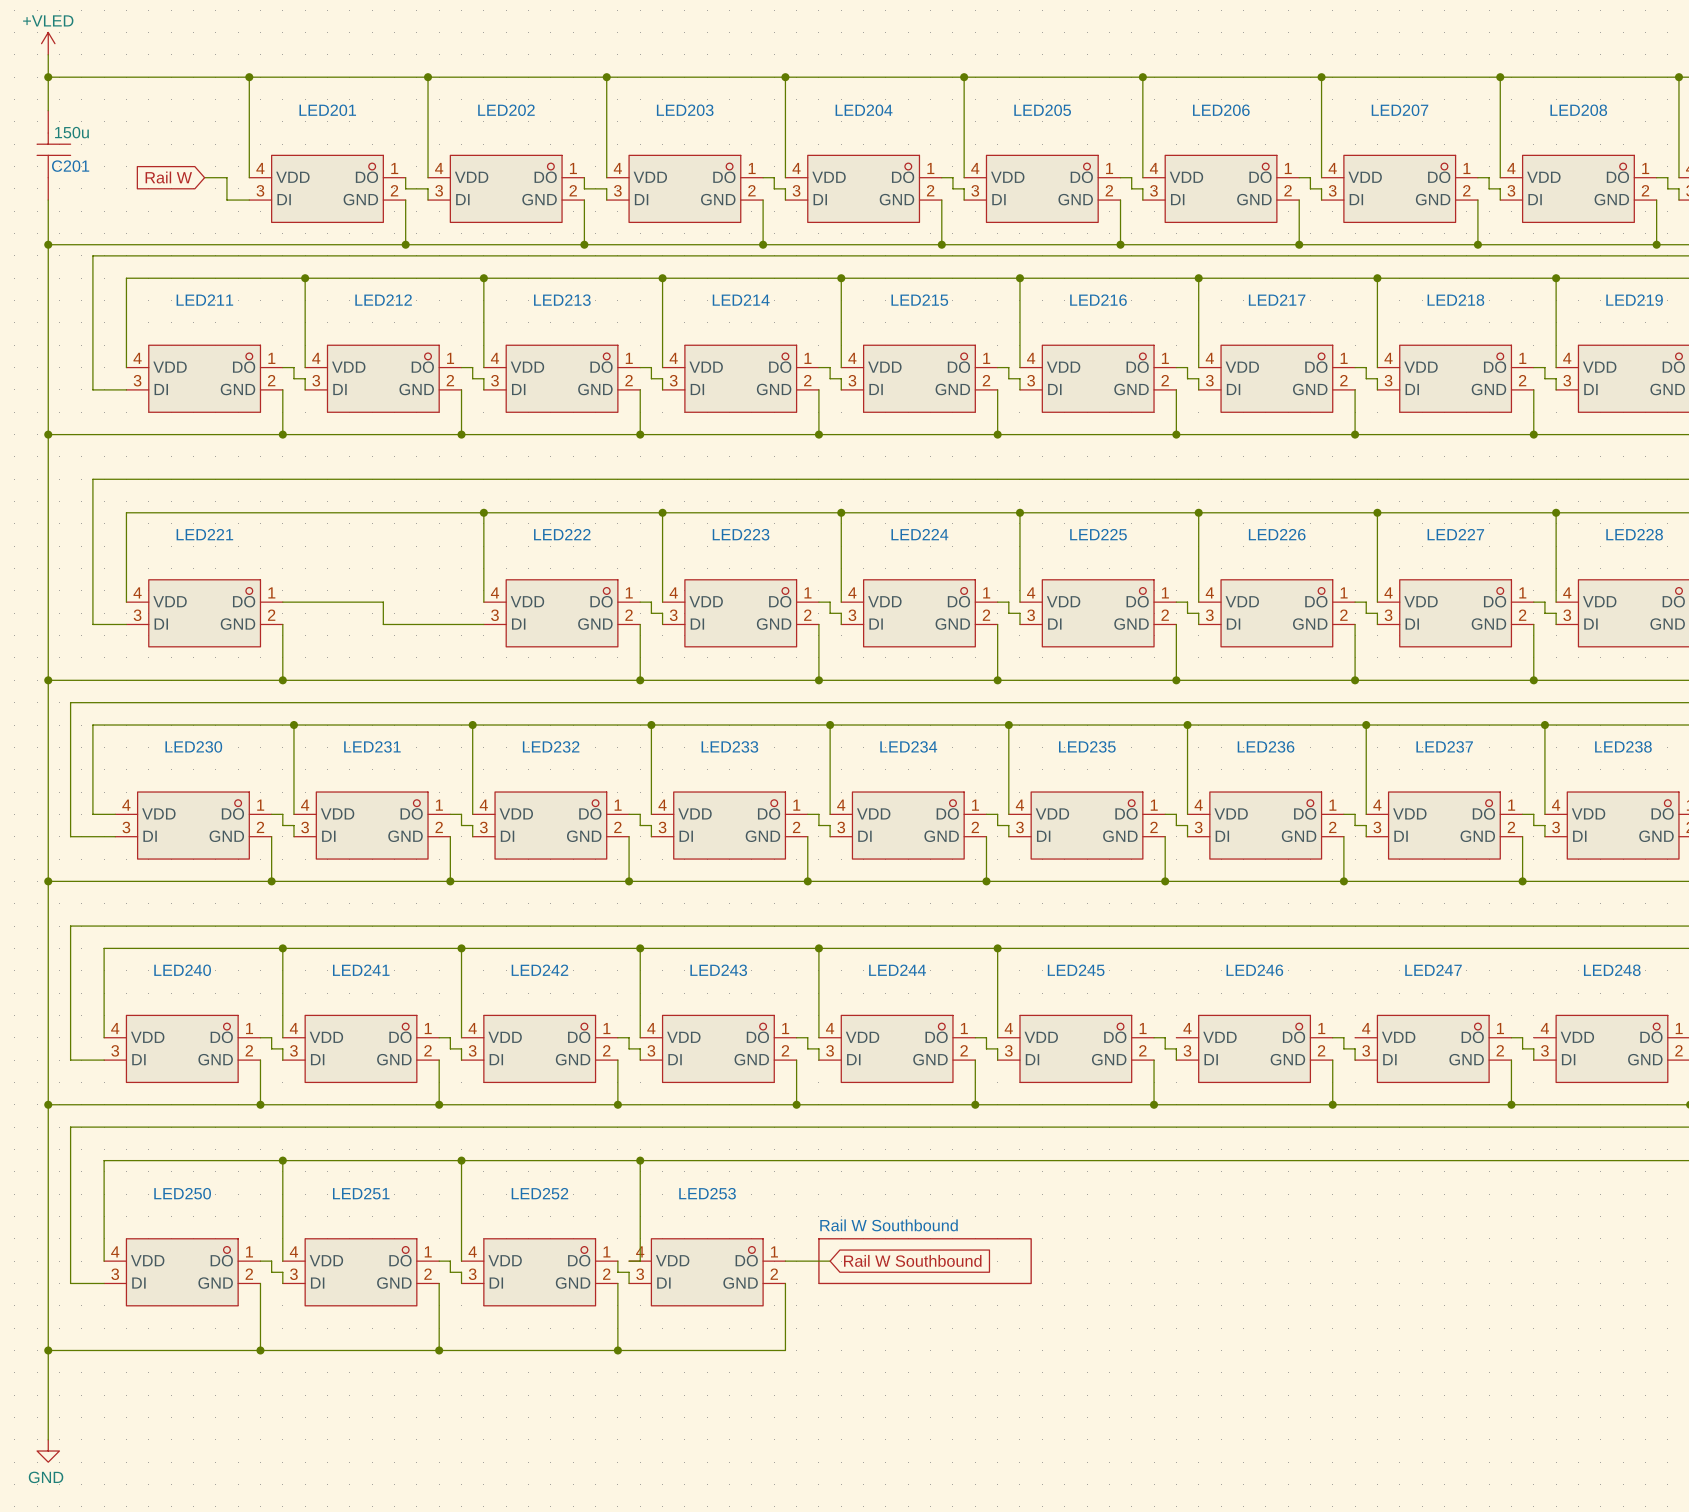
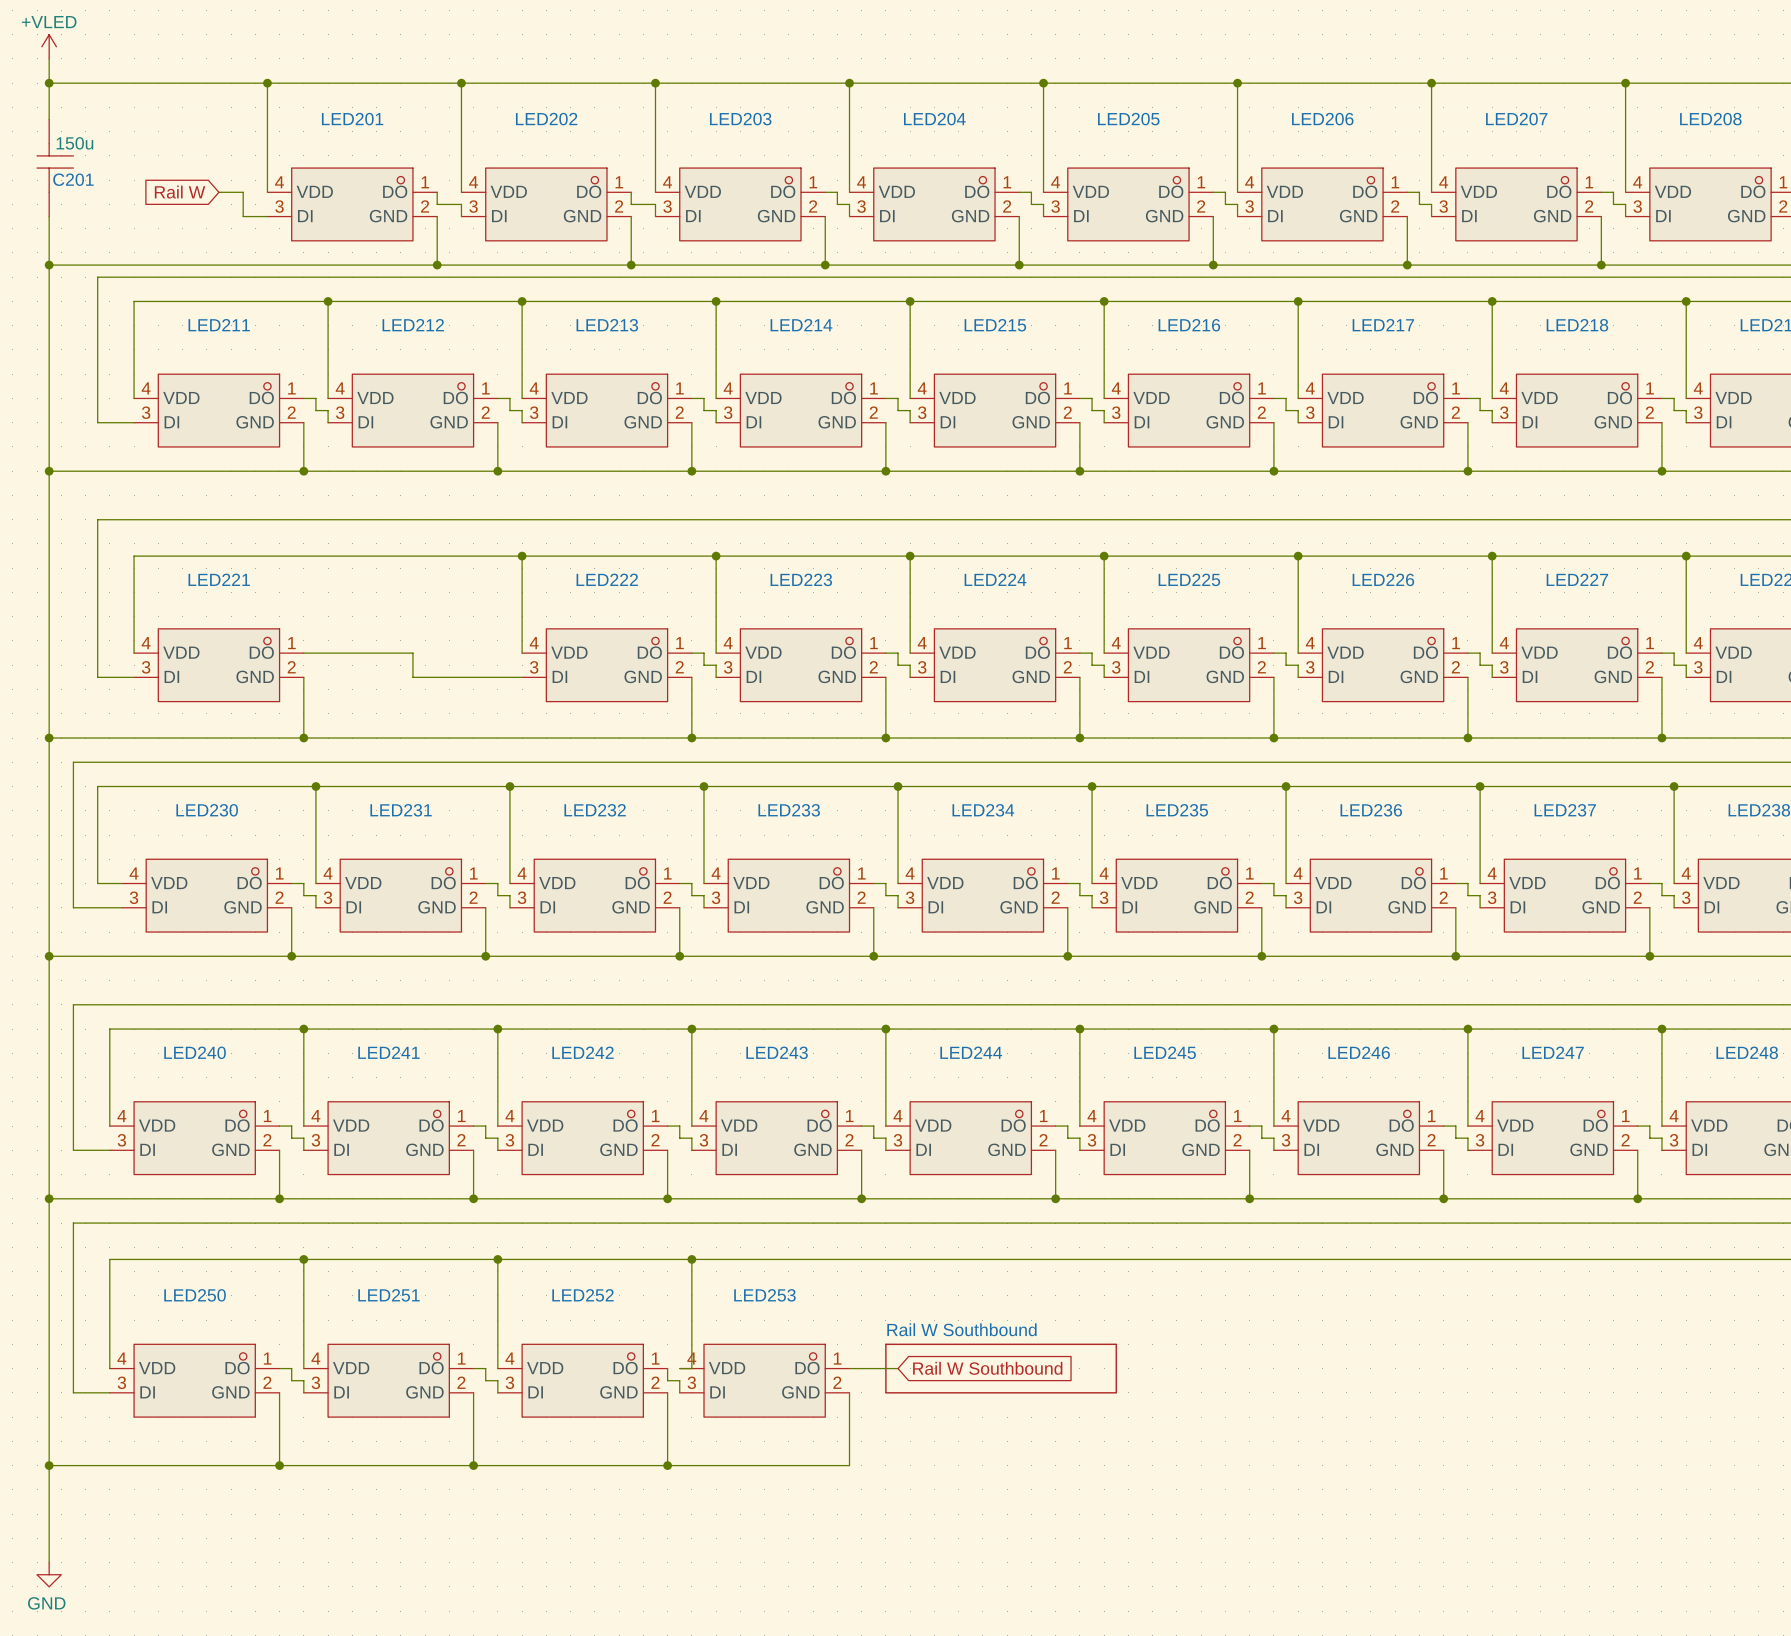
wire: none -> (1273, 1029) (1273, 1126)
junction: none -> (1273, 1029)
wire: none -> (1467, 1029) (1467, 1126)
junction: none -> (1467, 1029)
wire: none -> (1661, 1029) (1661, 1126)
junction: none -> (1661, 1029)

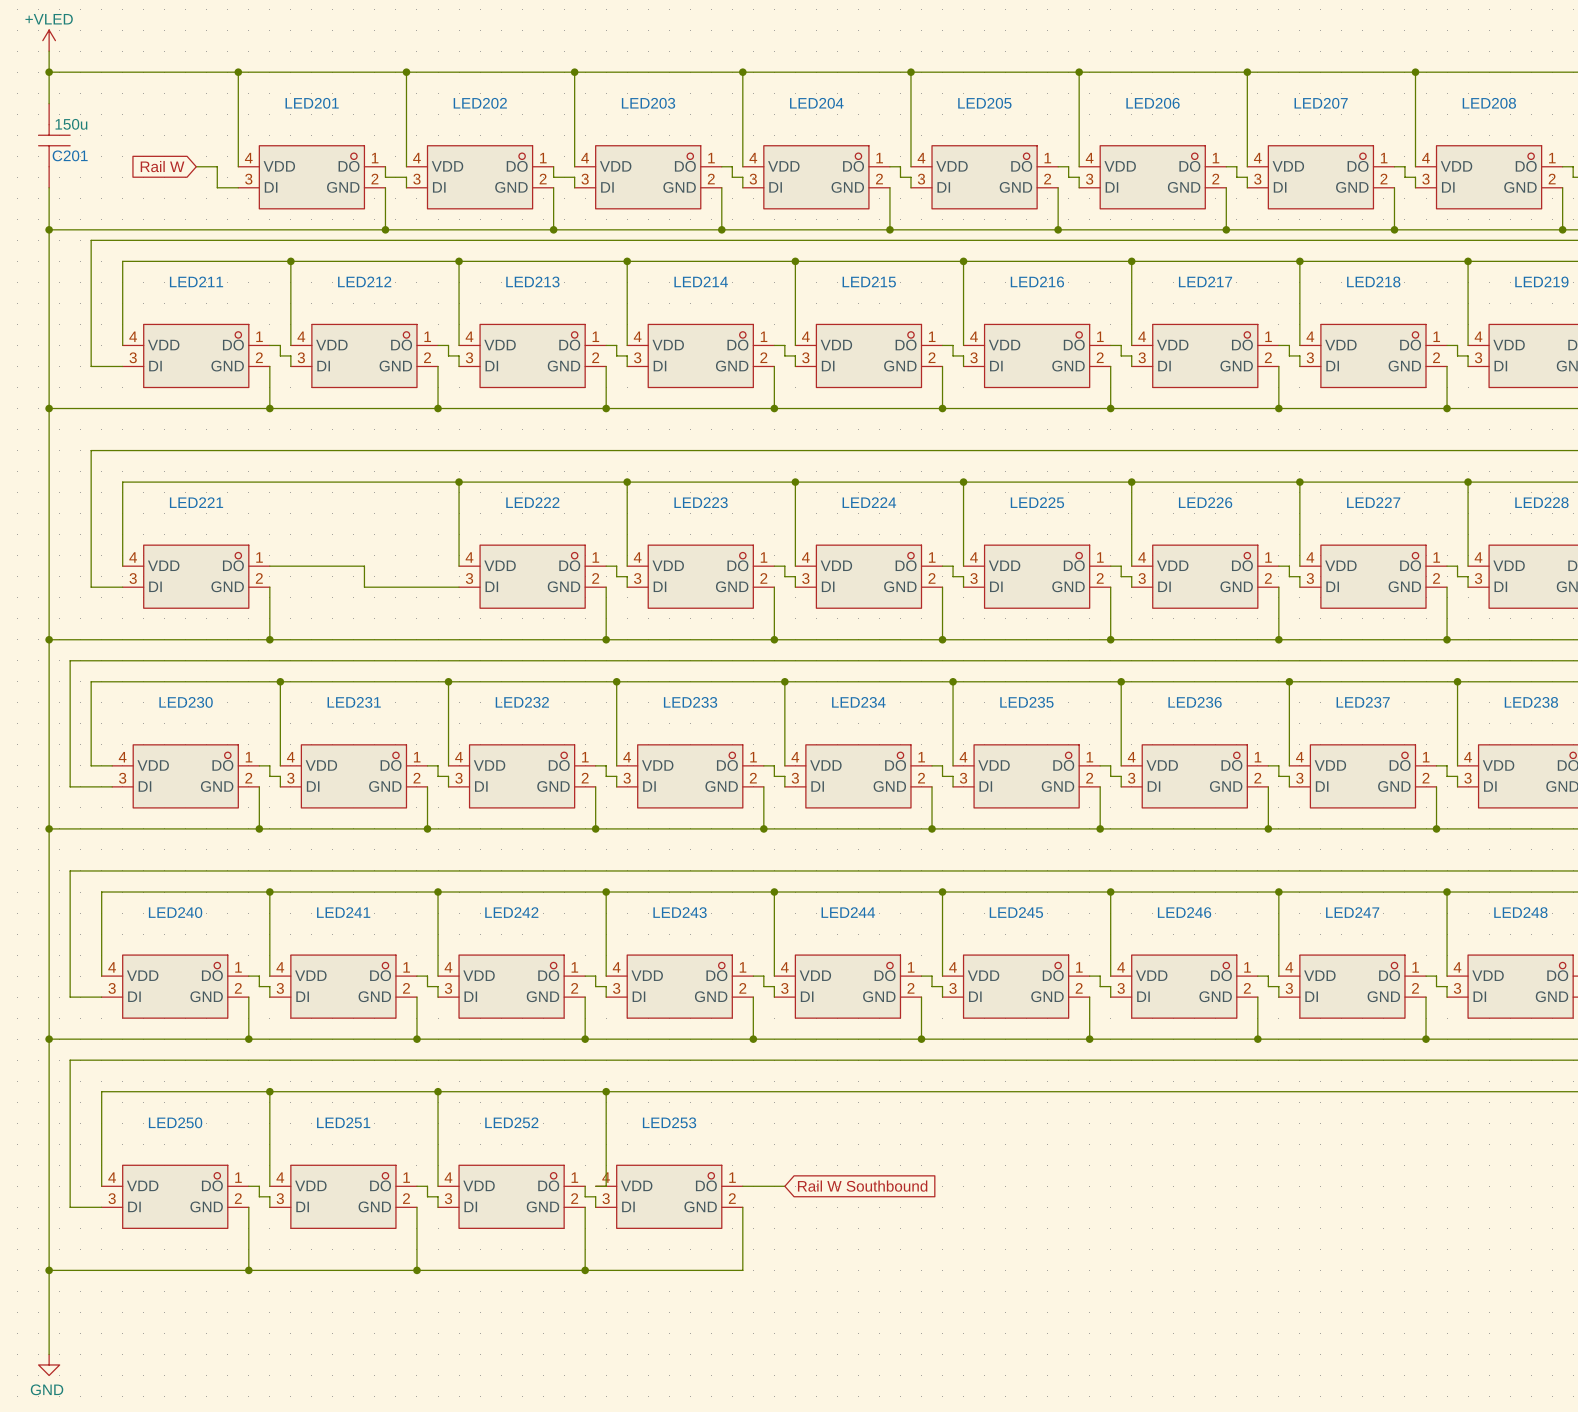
sheet Rail W Southbound: (1001, 1368) -> none

